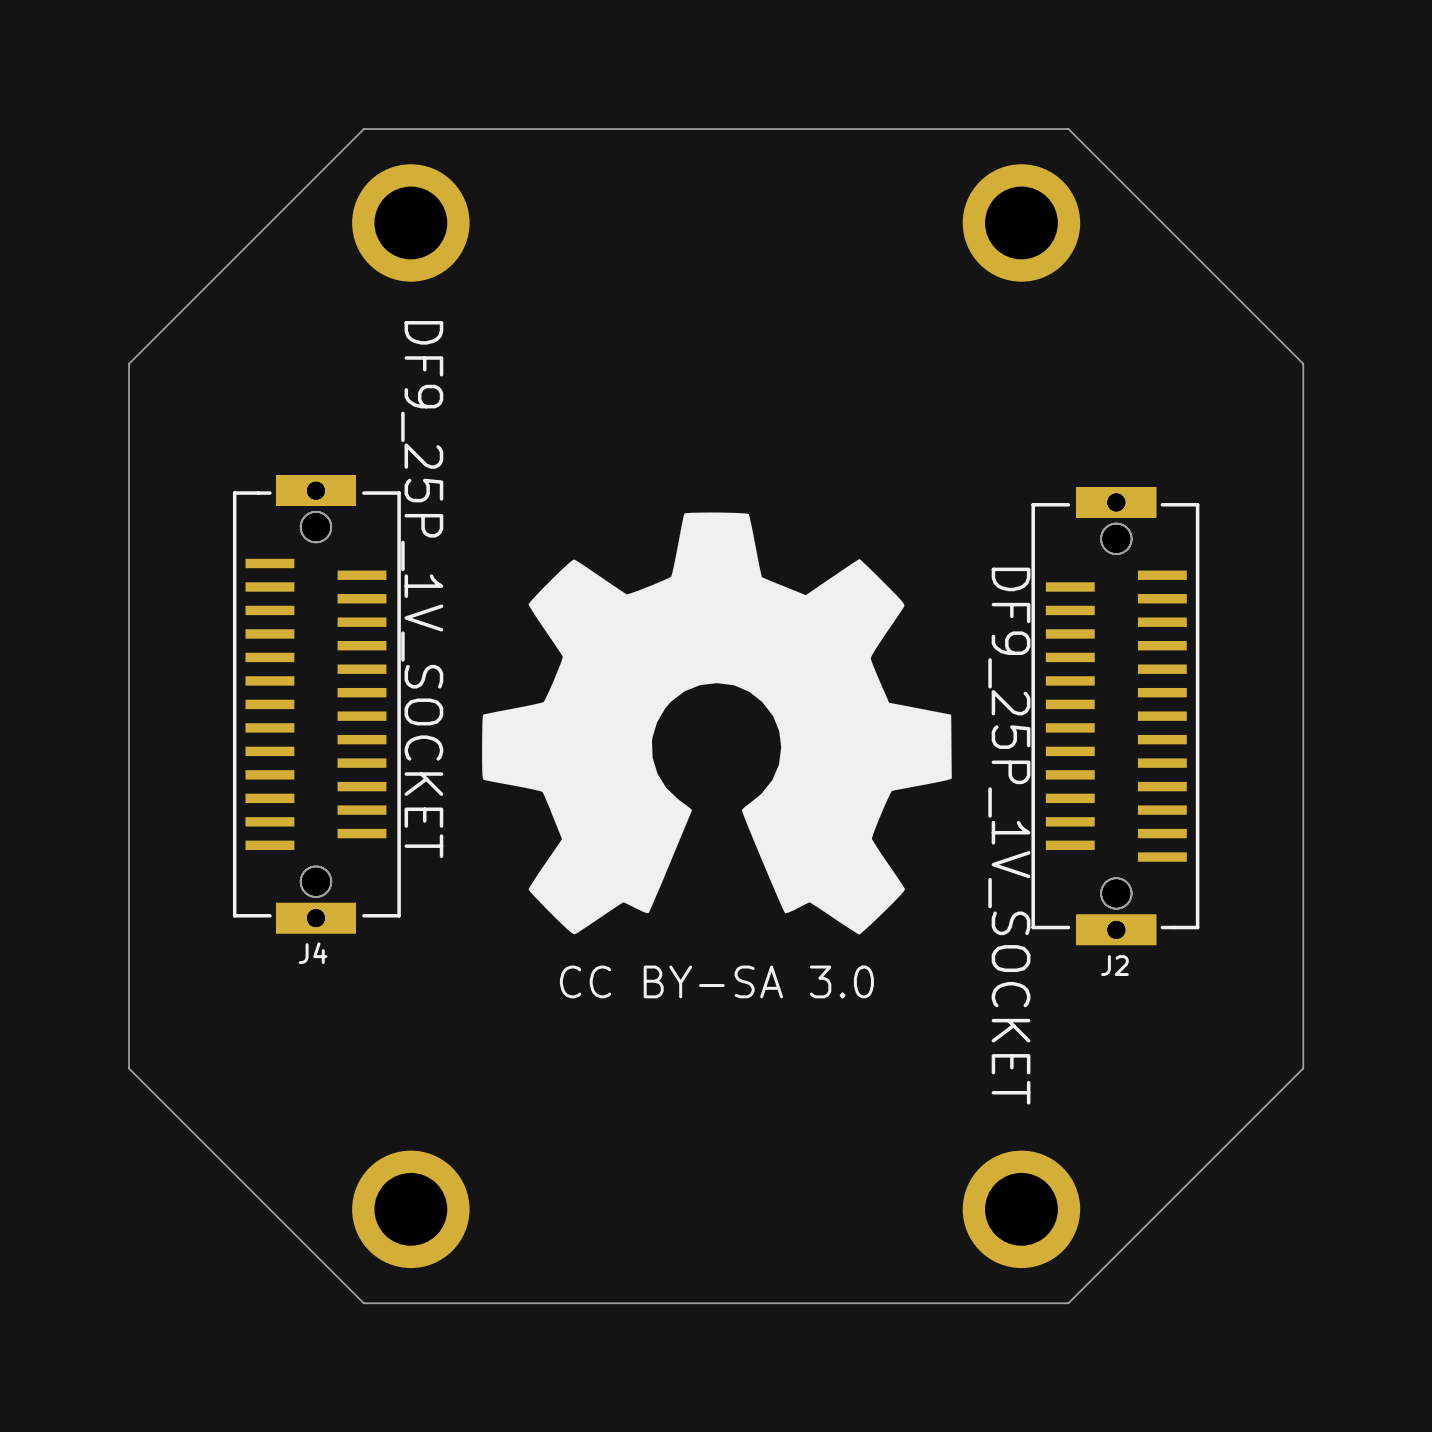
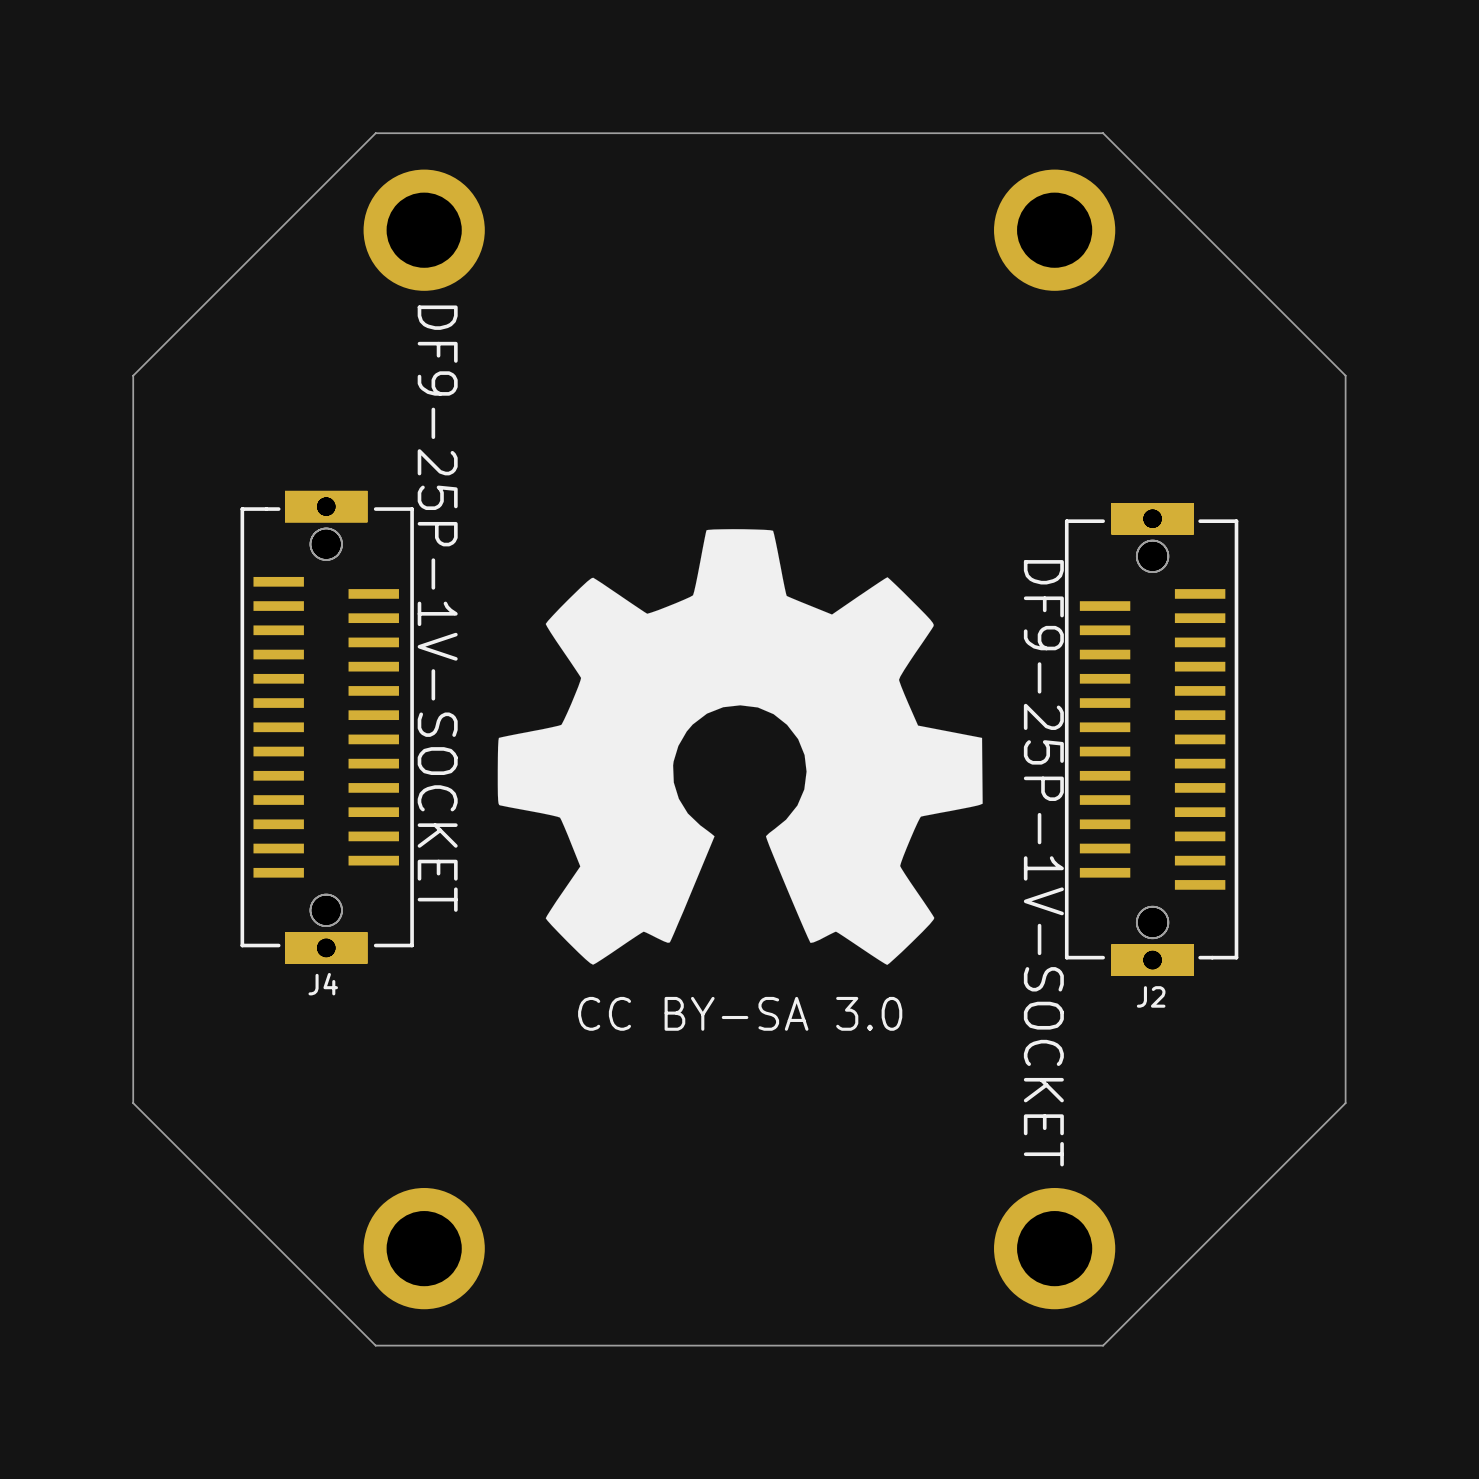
J4 value: DF9_25P_1V_SOCKET (422, 589) -> DF9-25P-1V-SOCKET (437, 608)
J2 value: DF9_25P_1V_SOCKET (1009, 836) -> DF9-25P-1V-SOCKET (1043, 863)

